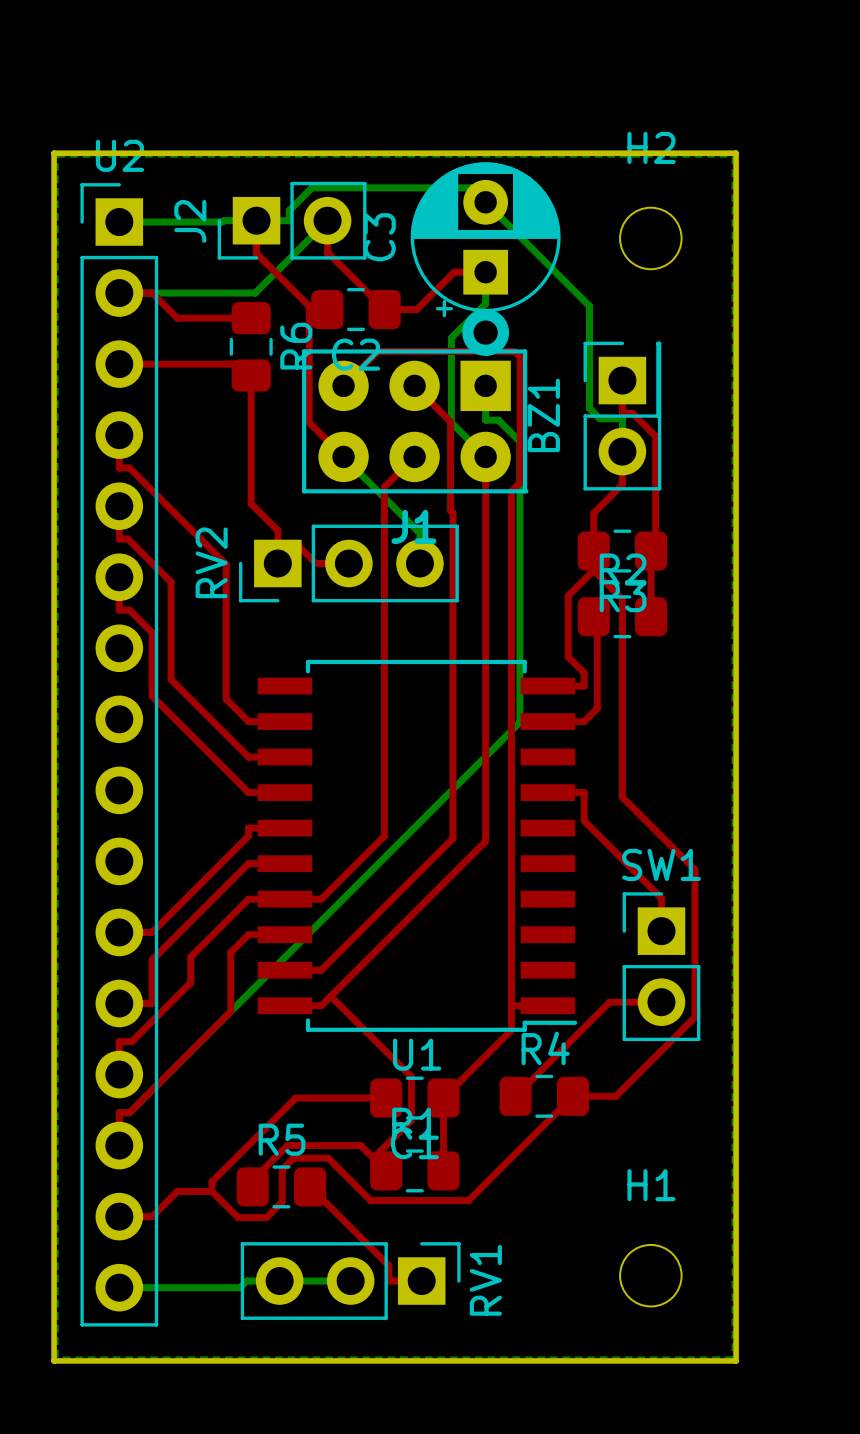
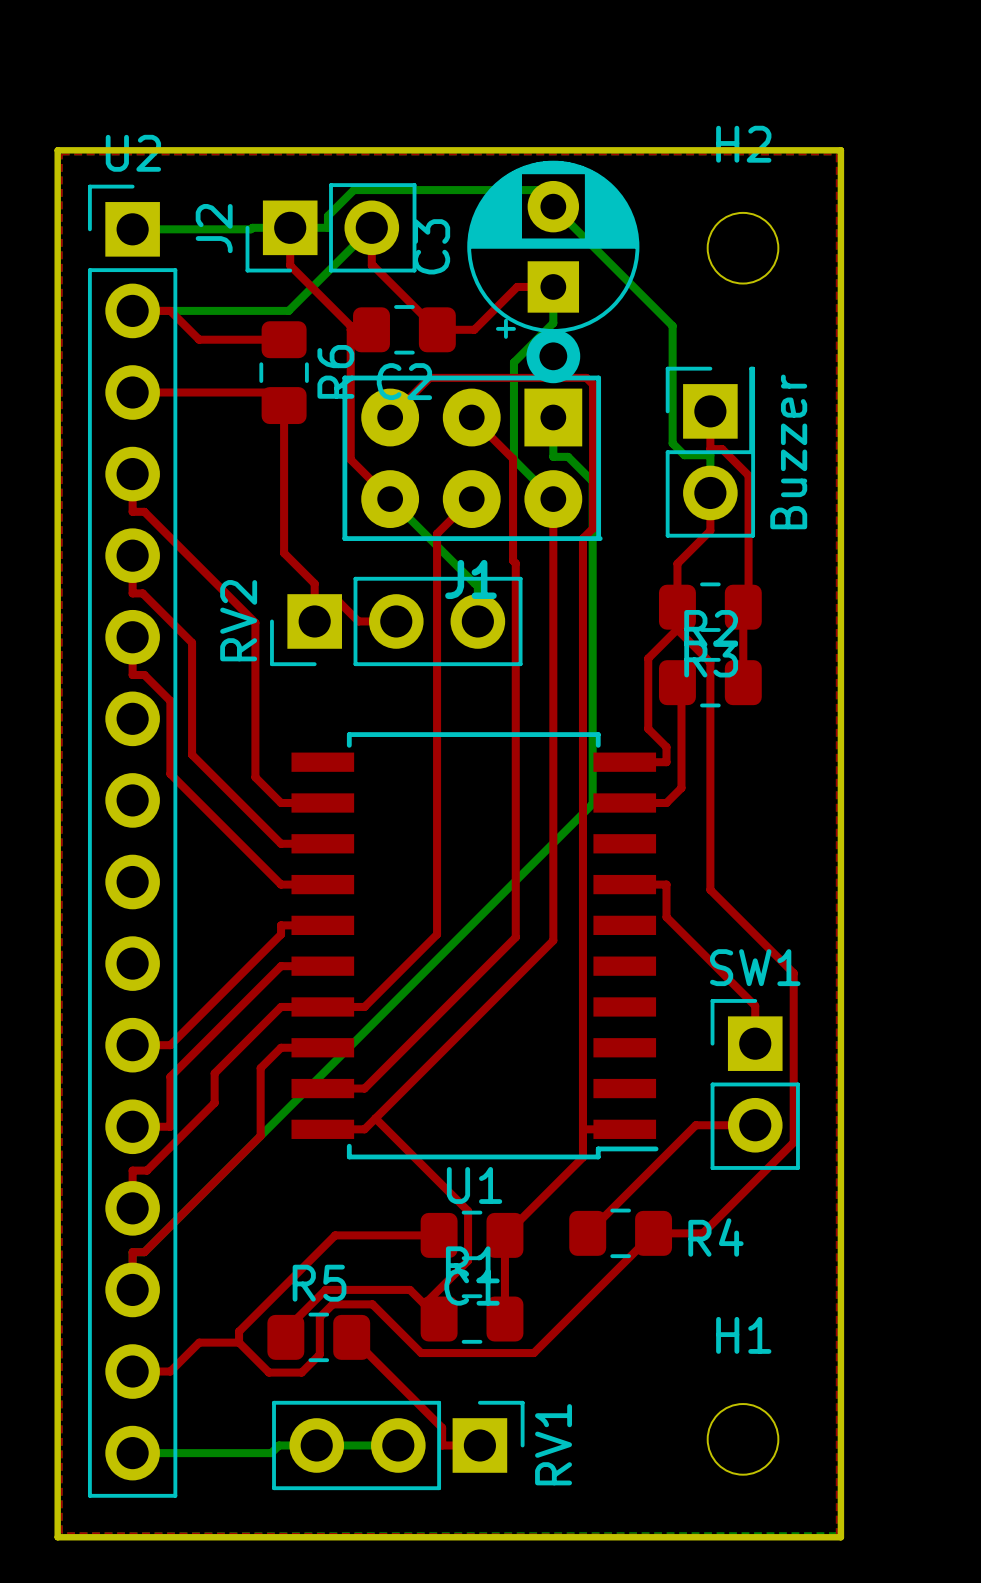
top zone outline: none -> (61, 154) (61, 1533) (836, 1535) (836, 154) (61, 154)
BZ1 name: BZ1 (543, 415) -> none
BZ1 value: none -> Buzzer (788, 451)
R4 name position: R4 (545, 1048) -> R4 (715, 1237)

